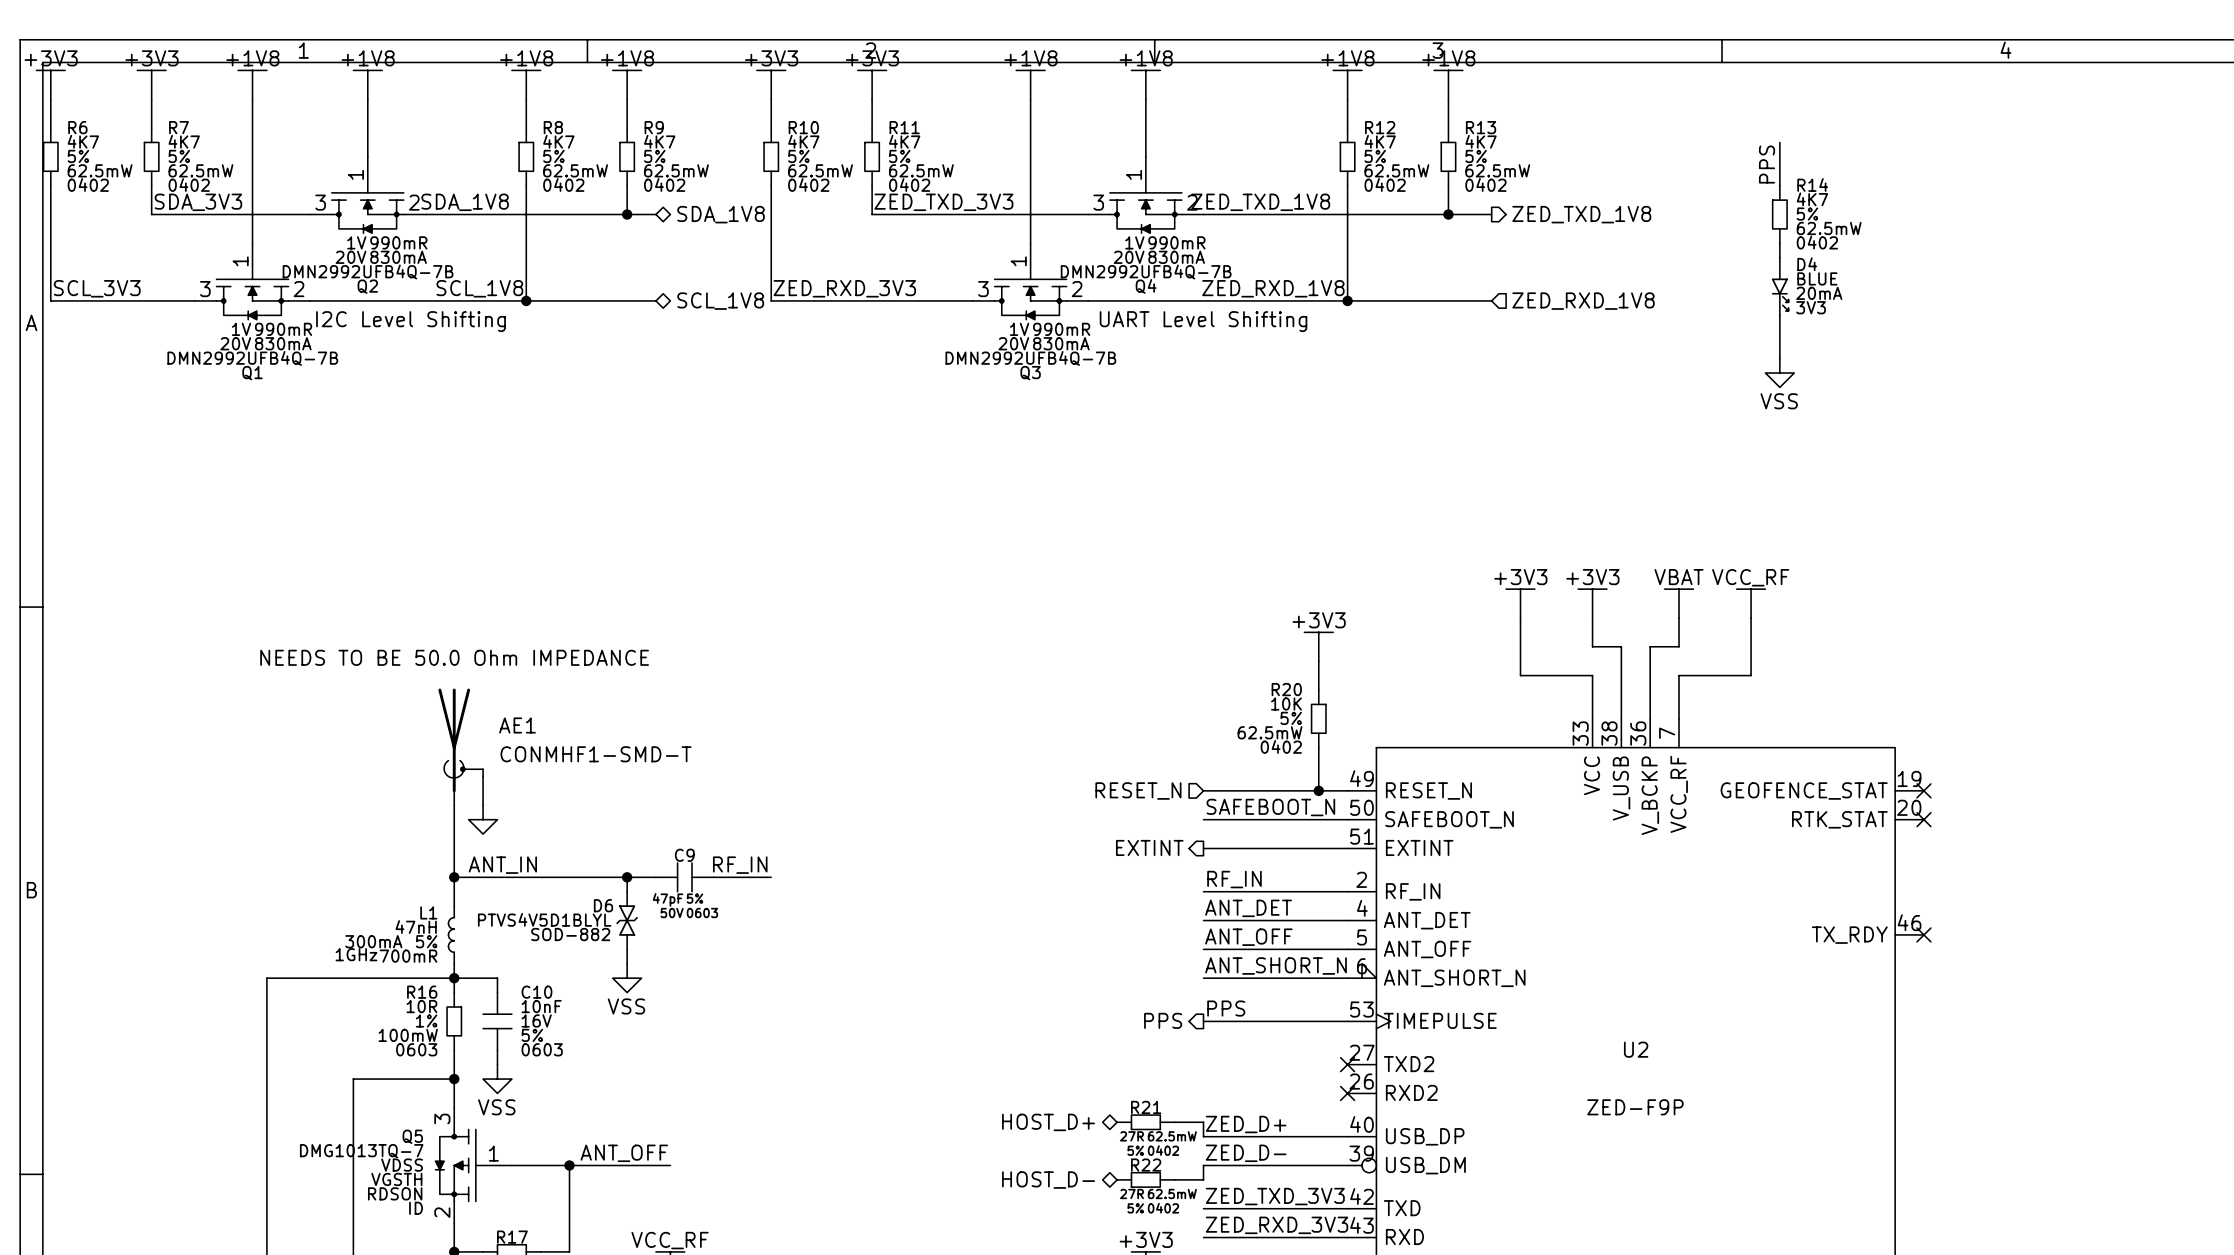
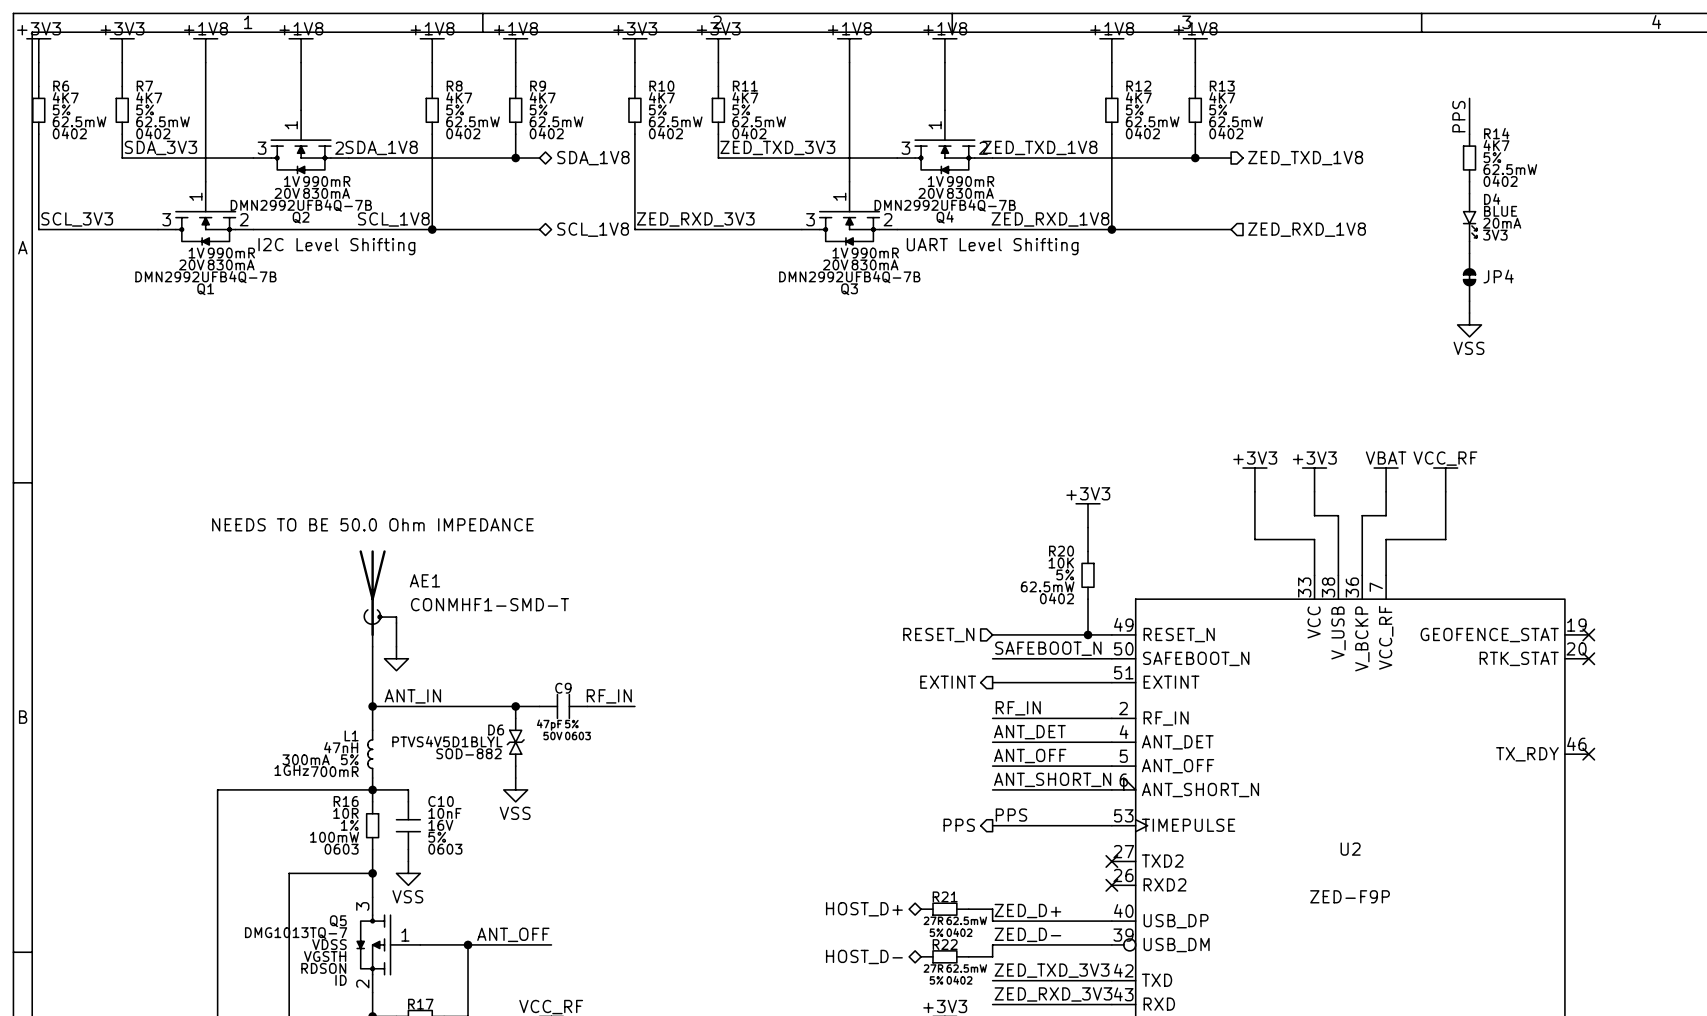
JP4: none -> (1469, 277)
power symbol position: VSS (1779, 373) -> VSS (1469, 324)
wire: none -> (1469, 301) (1469, 313)

